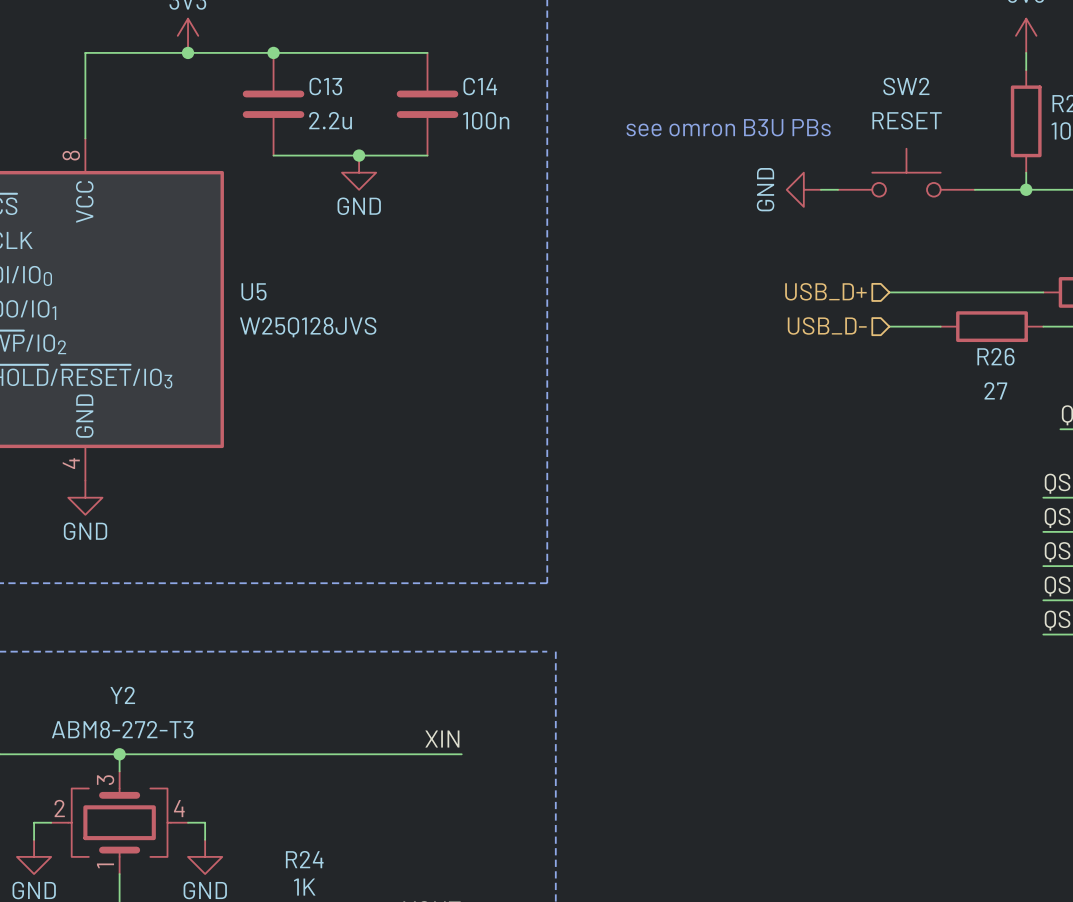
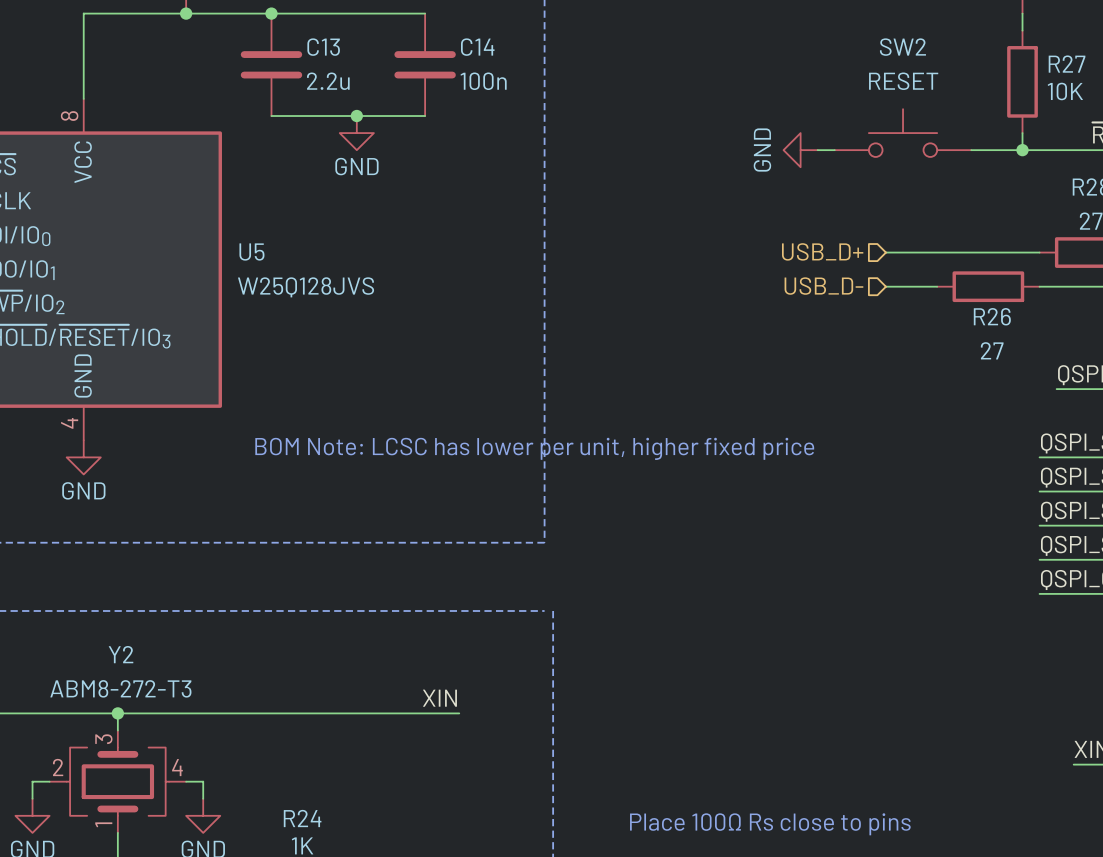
text: see omron B3U PBs (728, 127) -> none
text: none -> BOM Note: LCSC has lower per unit, higher fixed price (534, 448)
text: none -> Place 100Ω Rs close to pins (770, 824)

